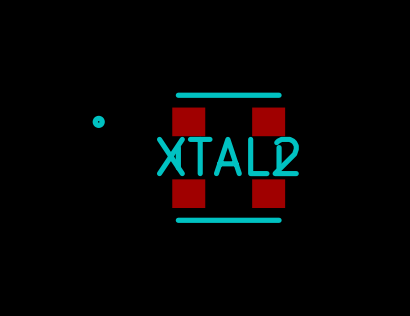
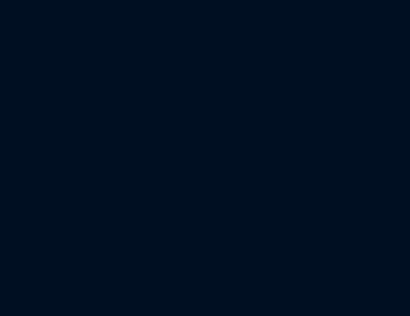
XTAL2: (188, 157) -> none

